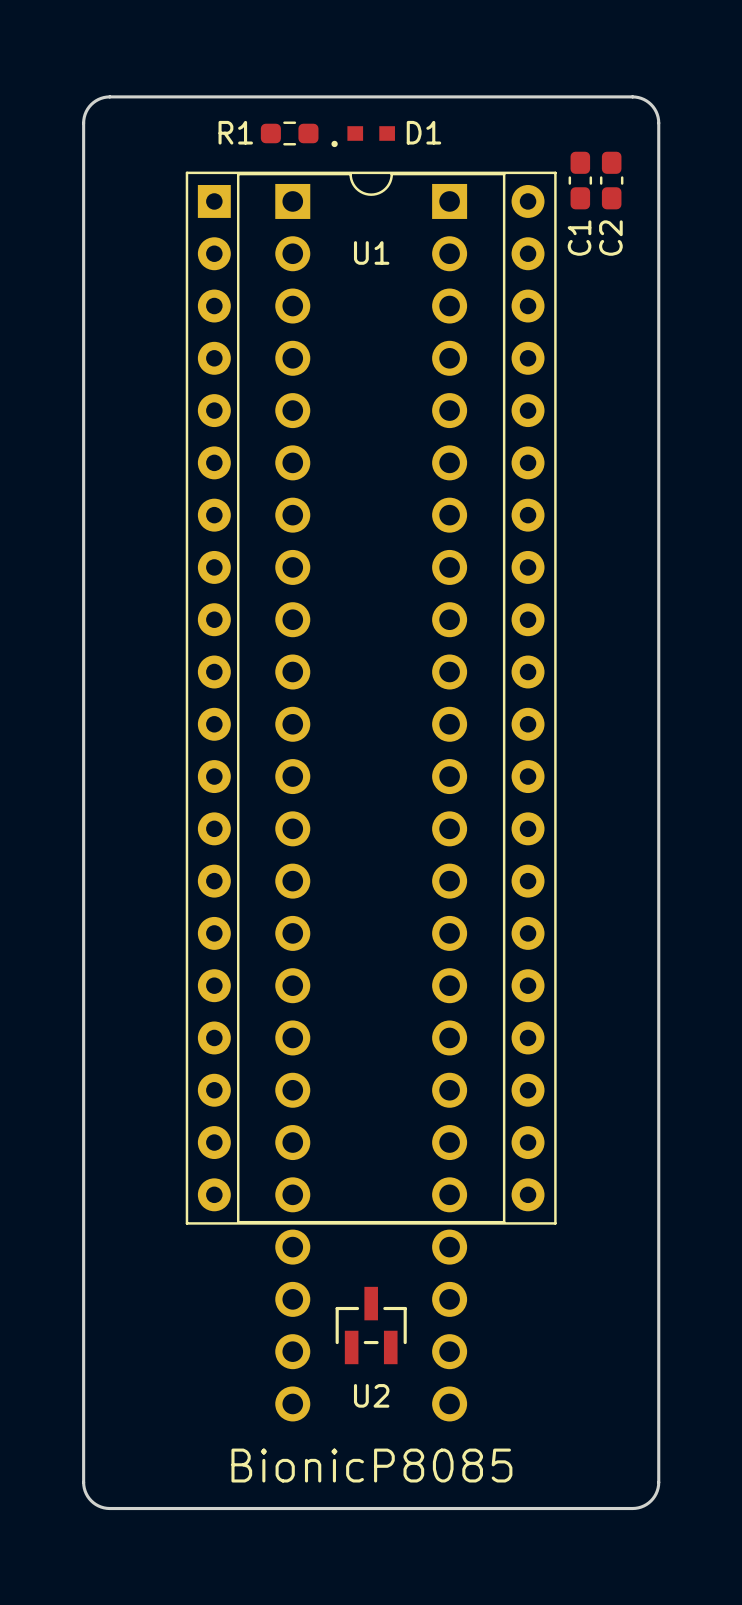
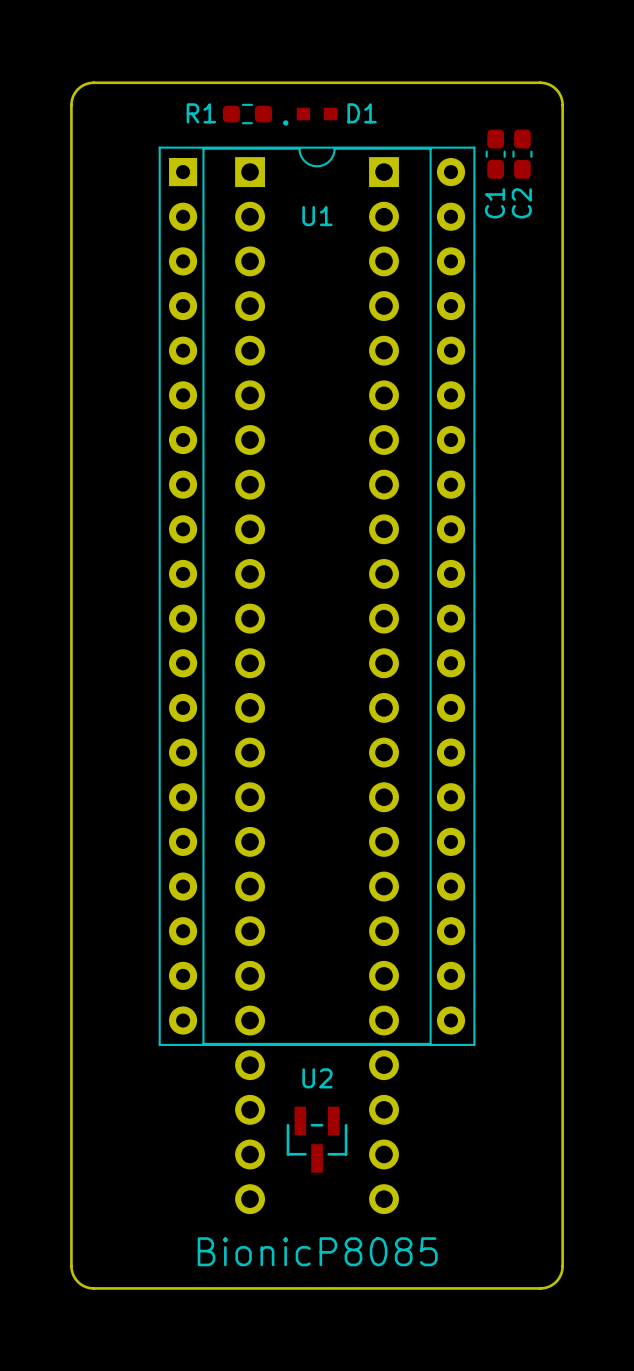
U2 rotation: 0° (371, 1325) -> 180° (317, 1139)

